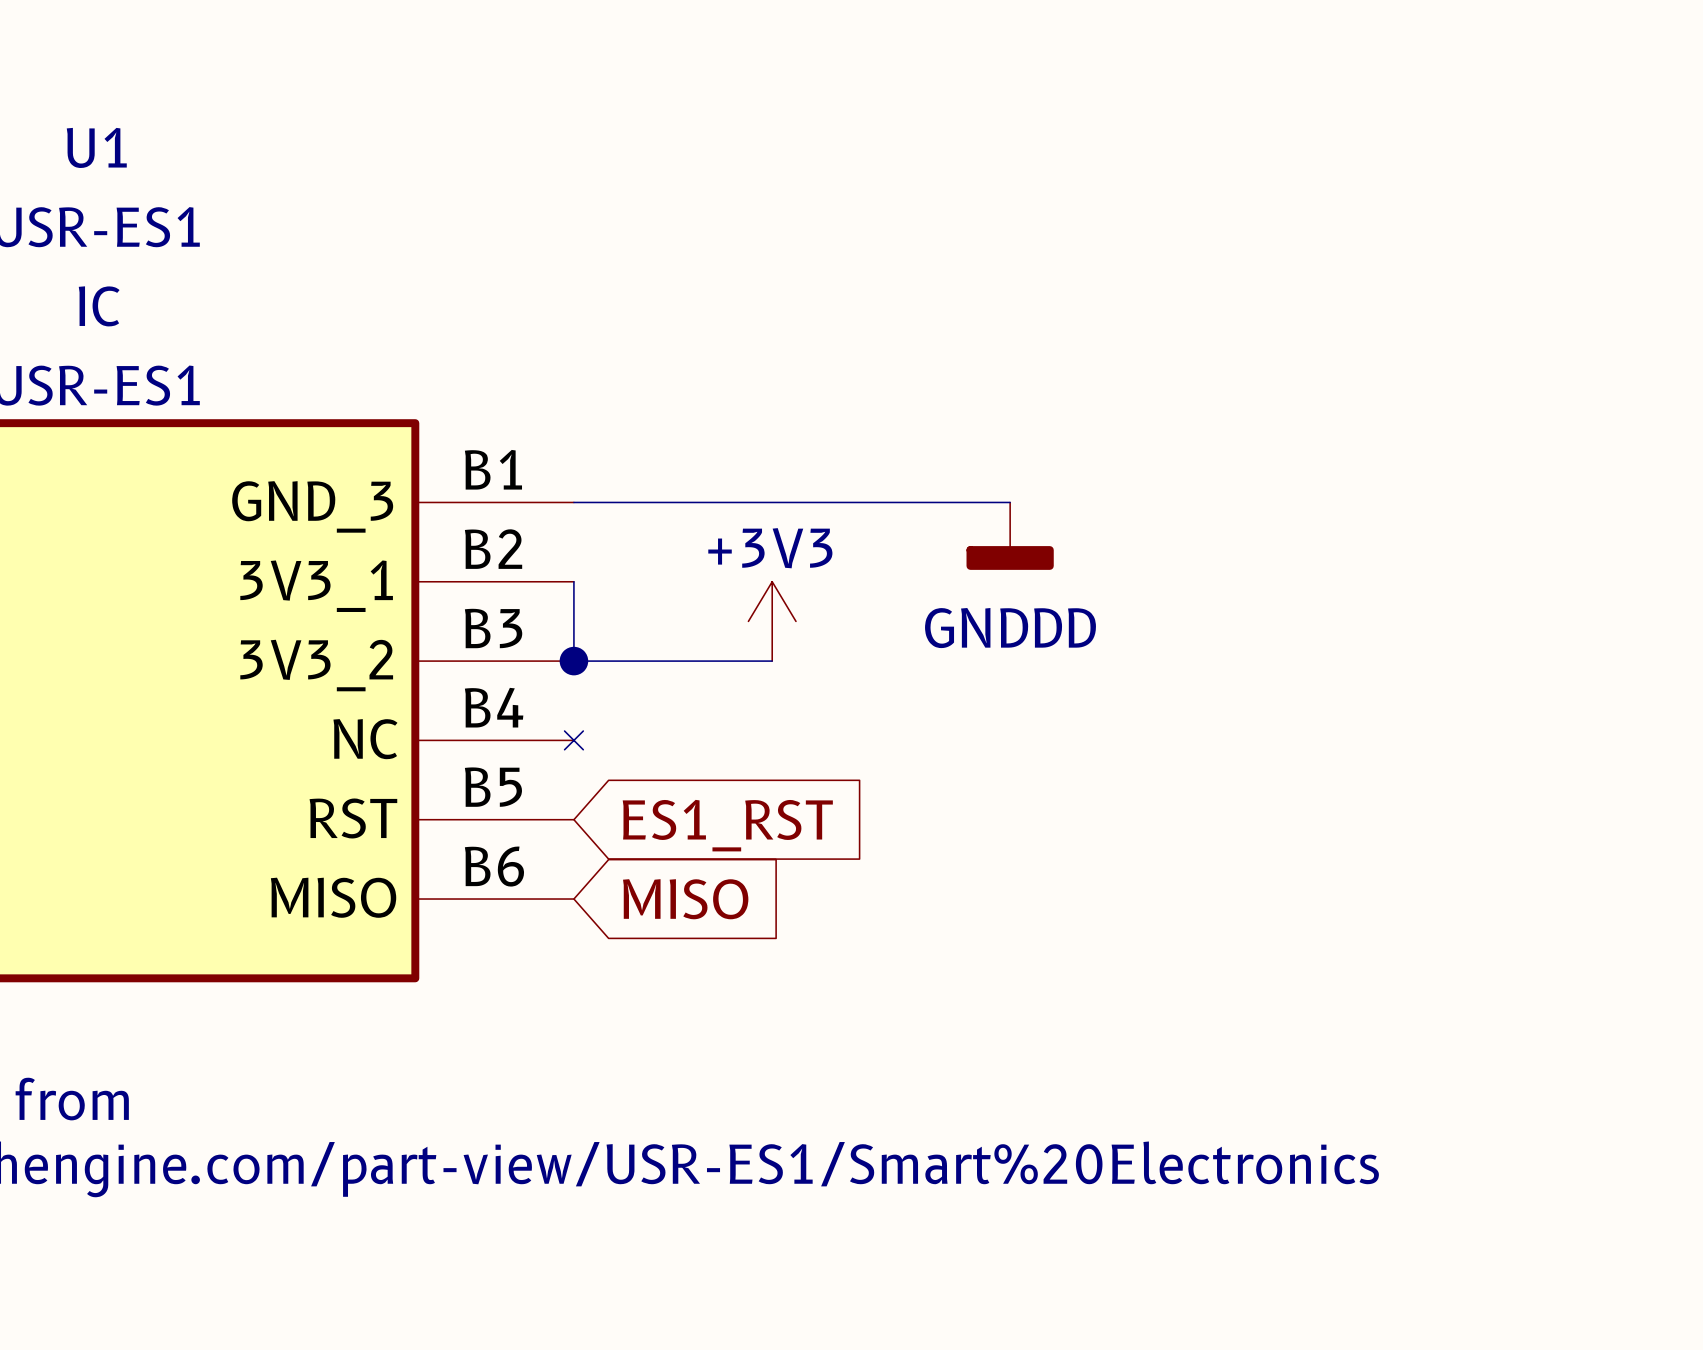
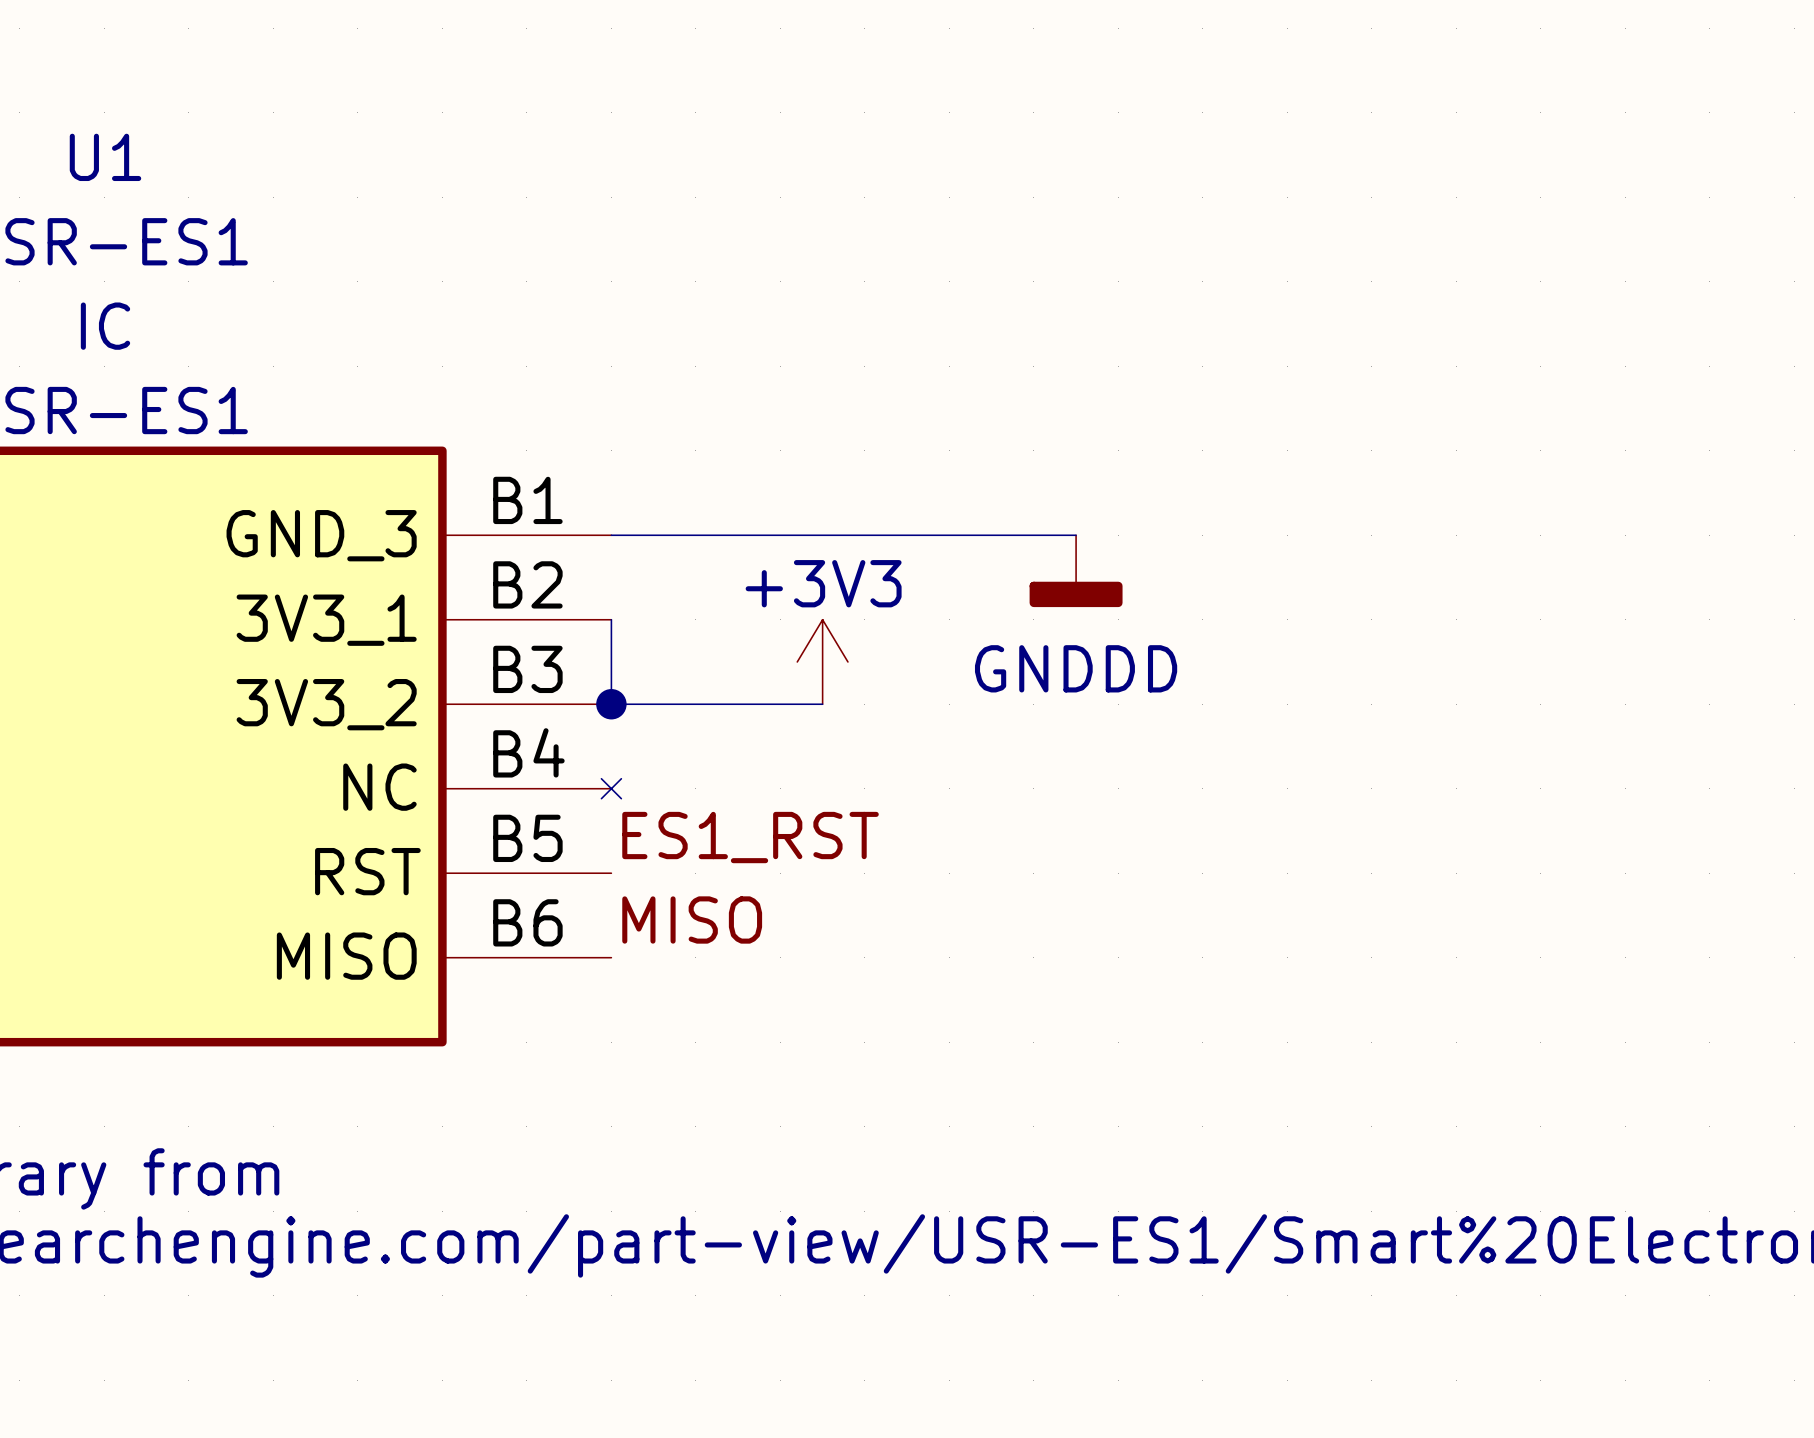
label: none -> ES1_RST (750, 837)
global label: ES1_RST (727, 825) -> none
label: none -> MISO (692, 920)
global label: MISO (685, 899) -> none

